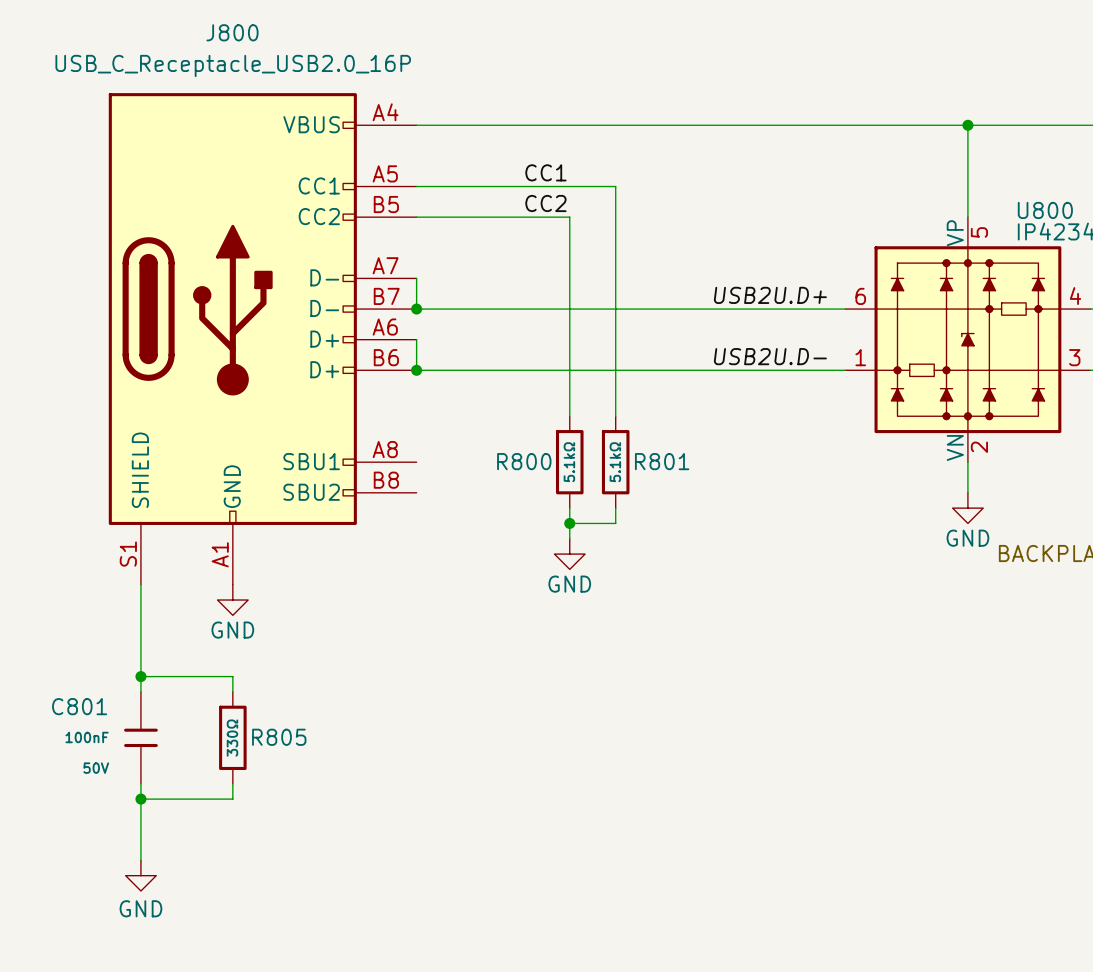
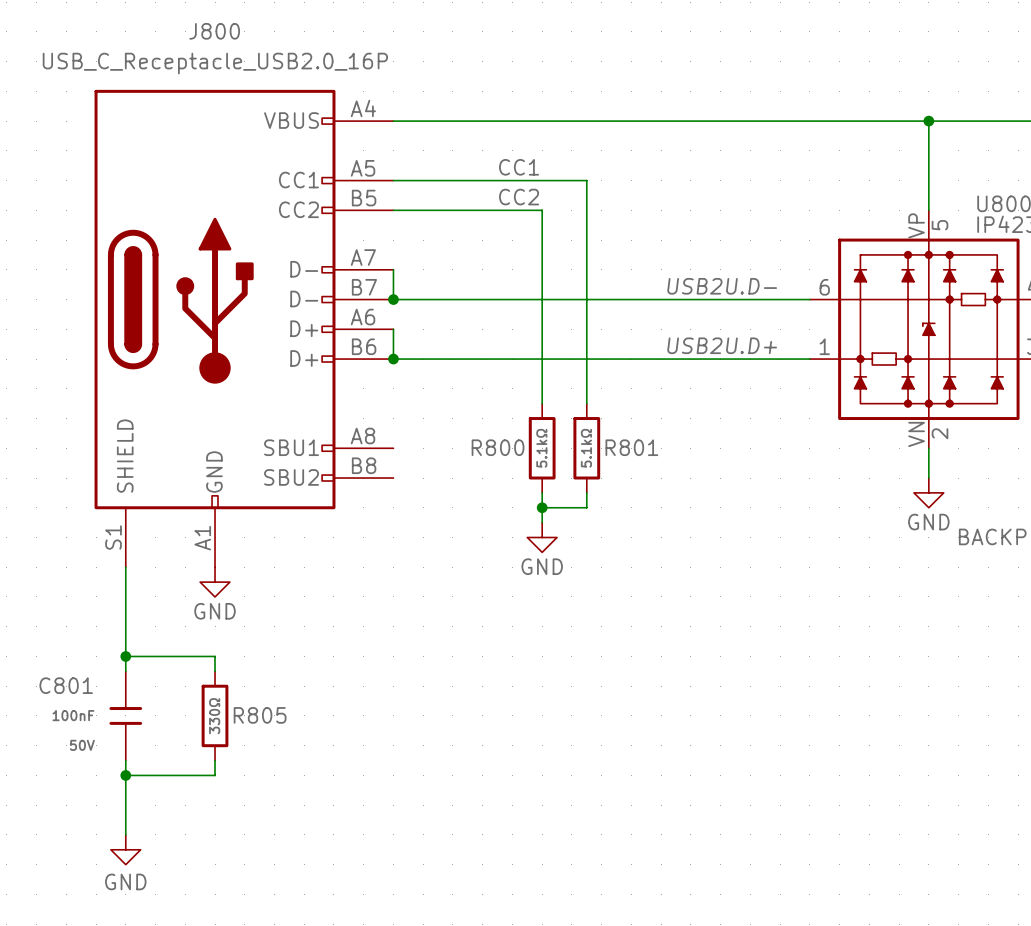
label position: USB2U.D+ (770, 295) -> USB2U.D+ (722, 345)
label position: USB2U.D- (770, 356) -> USB2U.D- (722, 286)

